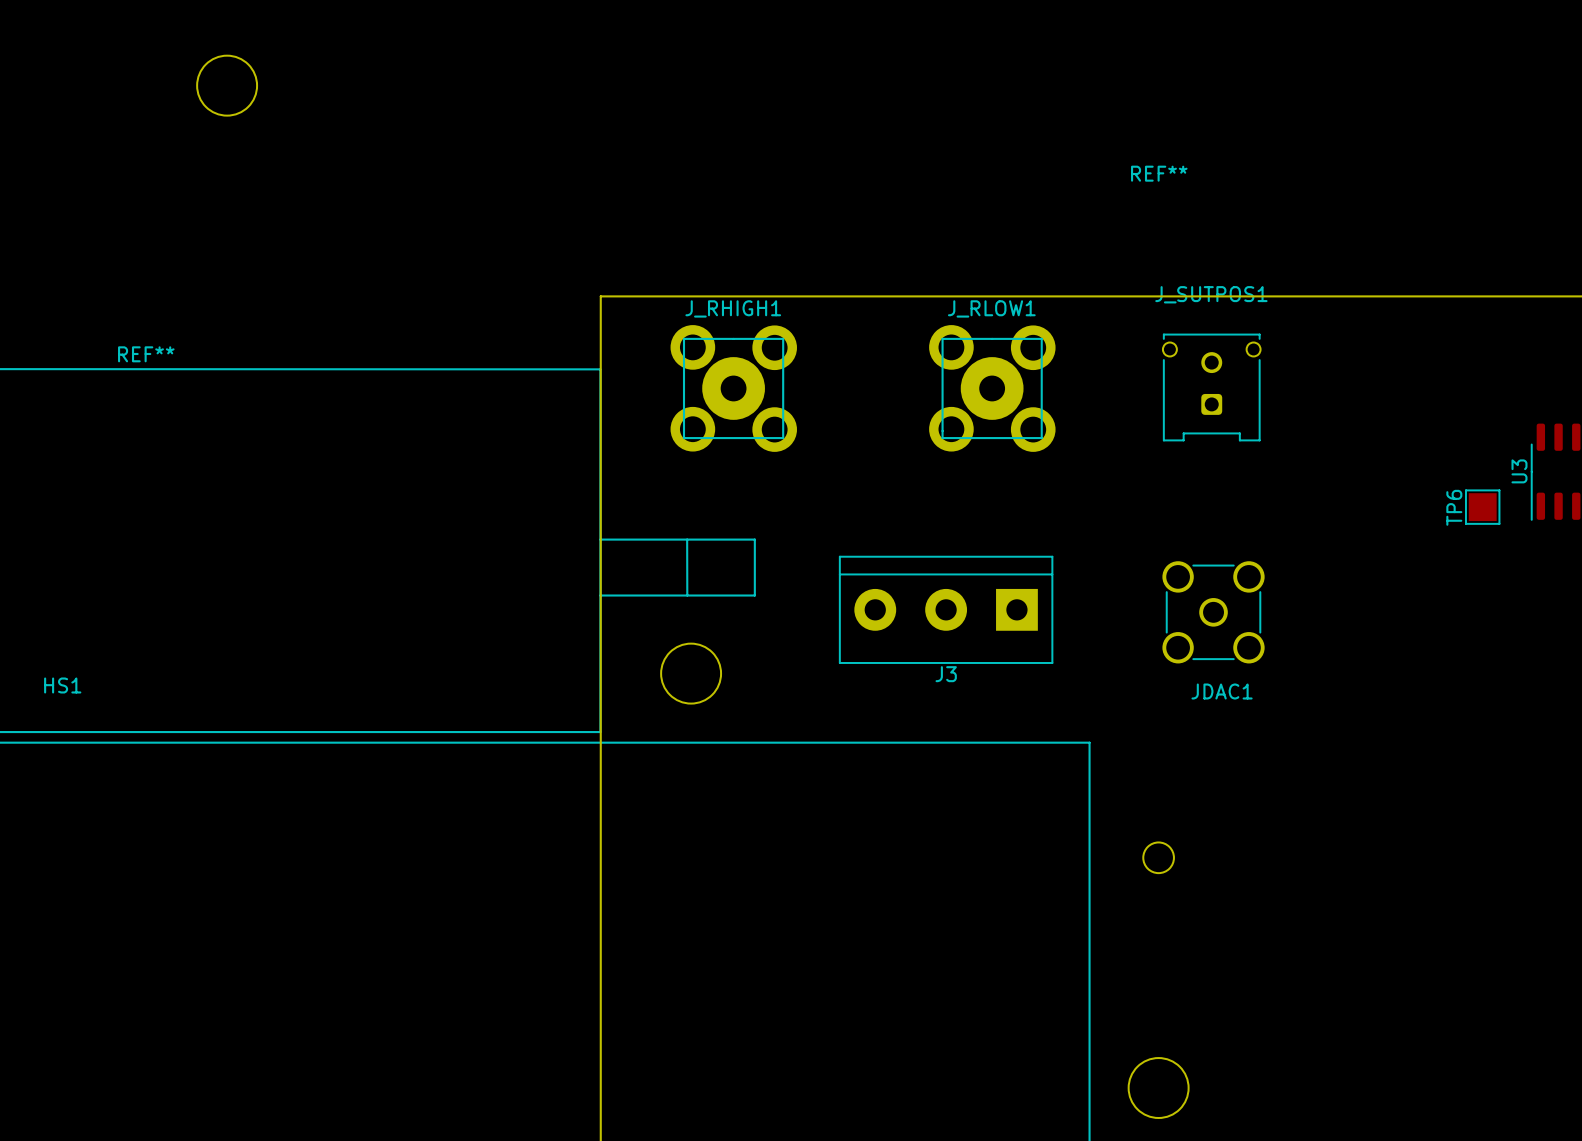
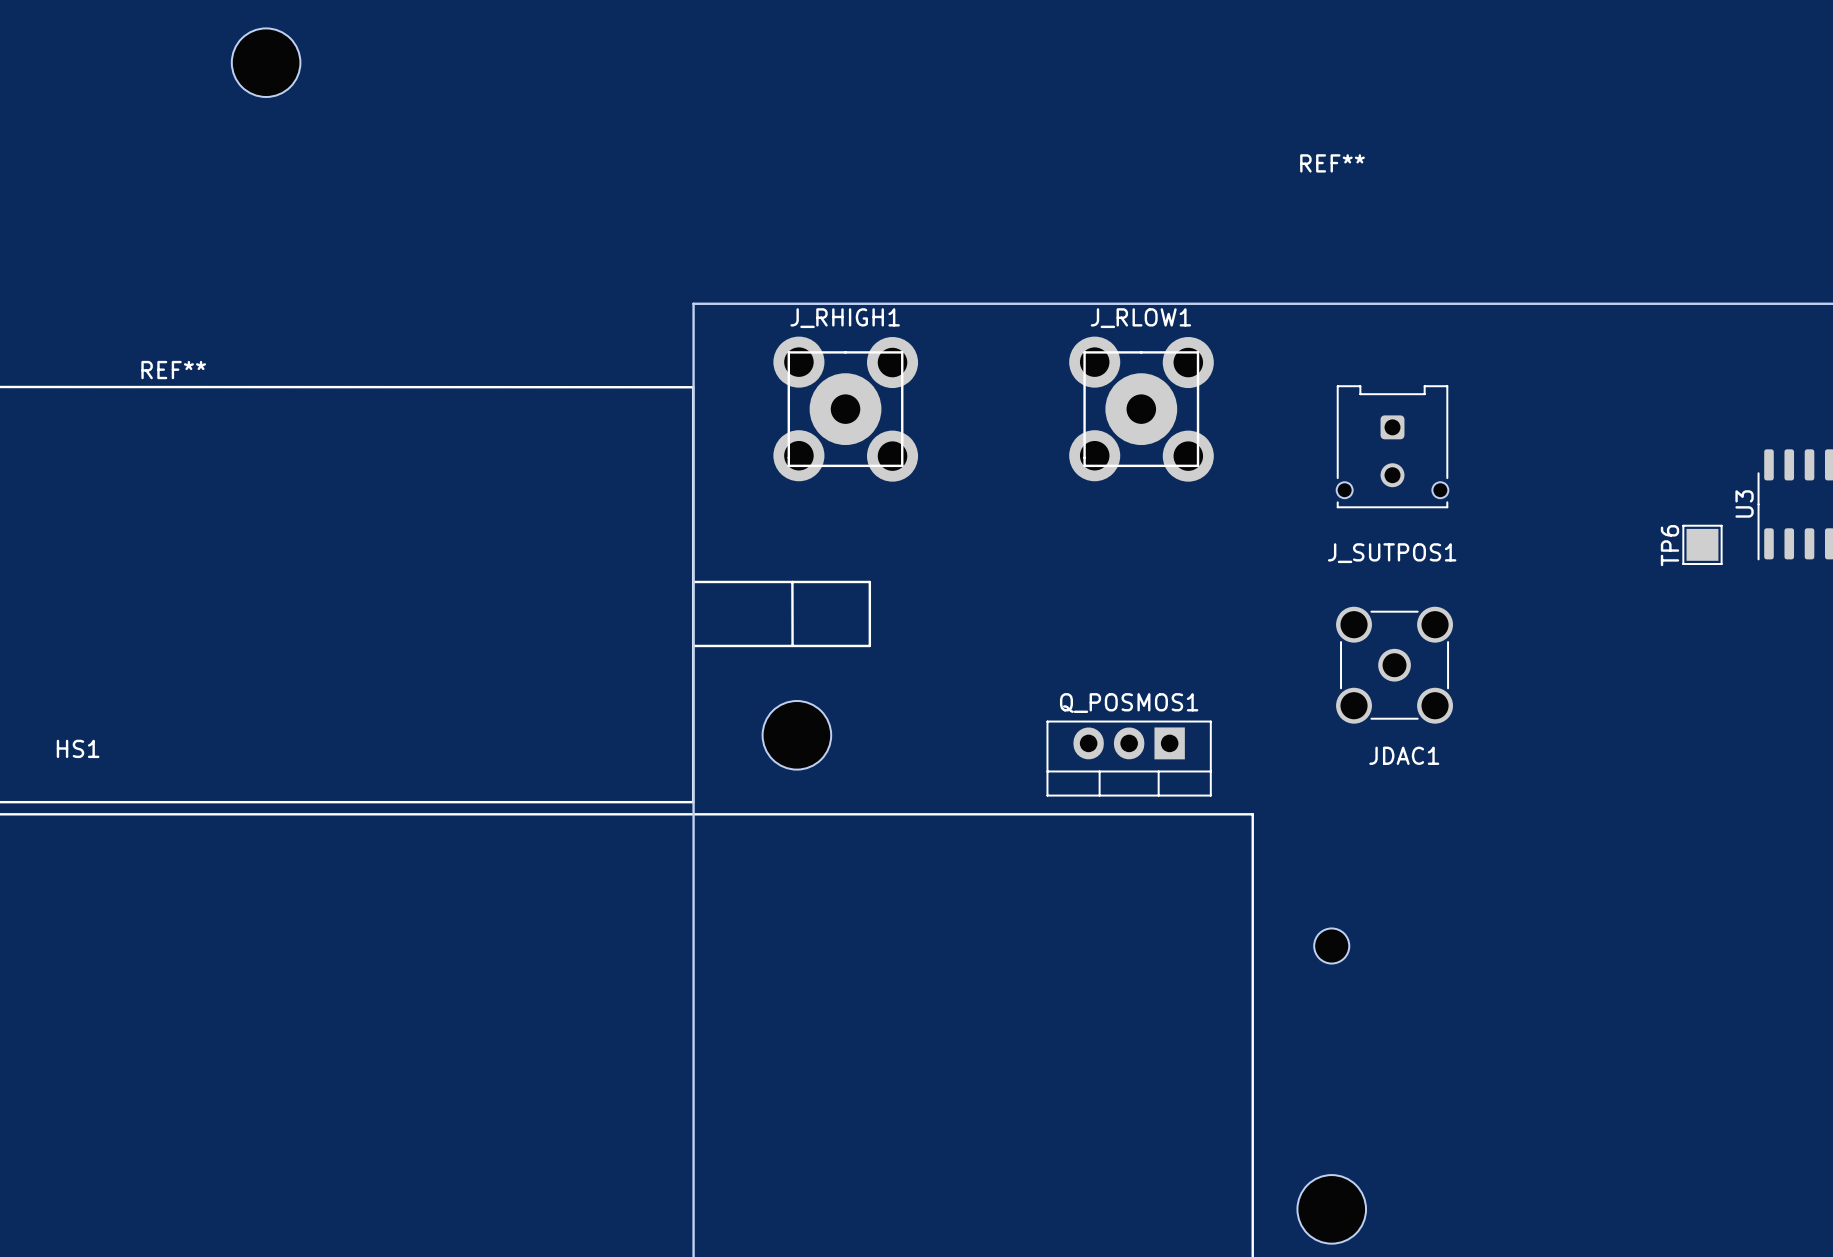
J_SUTPOS1 rotation: 0° (1211, 387) -> 180° (1392, 446)
J3: (946, 609) -> none
Q_POSMOS1: none -> (1129, 758)

